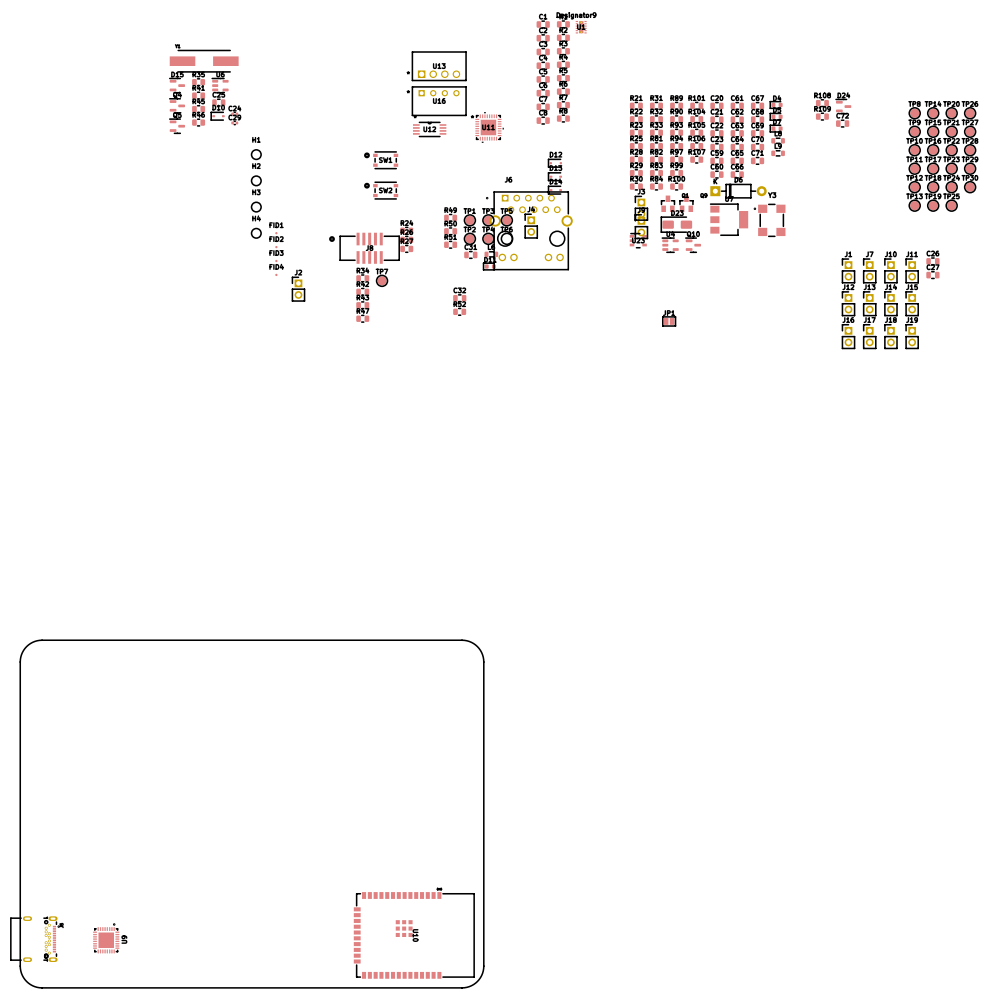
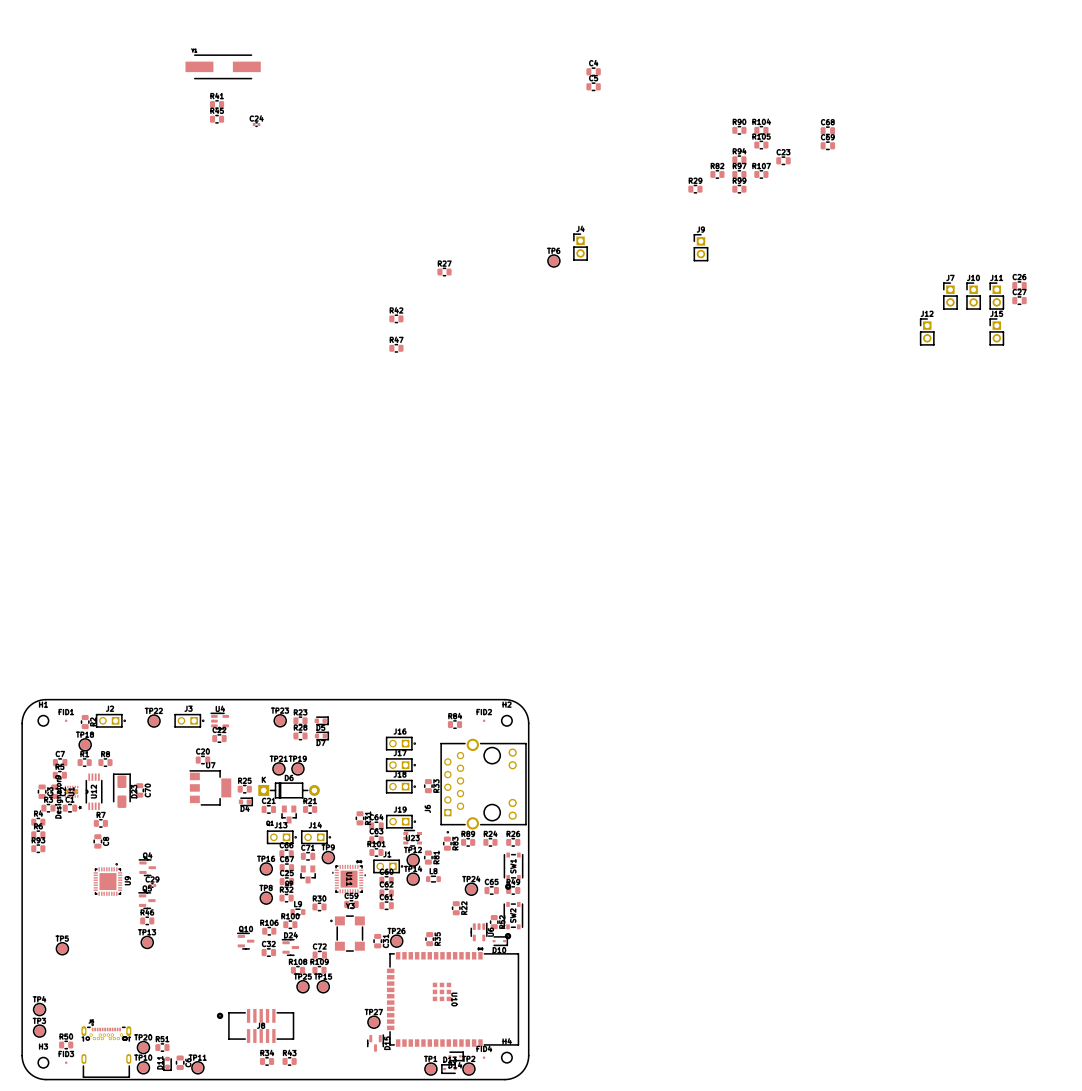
part position: (543, 24) -> (69, 808)
part position: (563, 24) -> (84, 762)
part rotation: 0° (581, 27) -> 90° counterclockwise (71, 791)
part position: (581, 27) -> (71, 791)
part rotation: 0° (563, 37) -> 90° clockwise (85, 722)
part position: (563, 37) -> (85, 722)
part rotation: 0° (543, 38) -> 90° clockwise (54, 791)
part position: (543, 38) -> (54, 791)
part rotation: 0° (543, 51) -> 90° clockwise (42, 791)
part position: (543, 51) -> (42, 791)
part position: (563, 51) -> (48, 808)
part position: (563, 64) -> (38, 822)
part: (439, 66) -> none
part position: (563, 78) -> (59, 775)
part rotation: 0° (198, 82) -> 90° clockwise (429, 939)
part position: (198, 82) -> (429, 939)
part rotation: 0° (177, 85) -> 90° clockwise (375, 1043)
part position: (177, 85) -> (375, 1043)
part rotation: 0° (220, 85) -> 90° clockwise (479, 932)
part position: (220, 85) -> (479, 932)
part position: (563, 91) -> (38, 834)
part rotation: 0° (543, 93) -> 90° clockwise (180, 1062)
part position: (543, 93) -> (180, 1062)
part: (439, 101) -> none
part position: (218, 102) -> (286, 881)
part position: (822, 103) -> (297, 970)
part rotation: 0° (776, 104) -> 180° (245, 801)
part position: (776, 104) -> (245, 801)
part position: (177, 105) -> (147, 867)
part position: (563, 105) -> (100, 823)
part position: (636, 105) -> (310, 809)
part rotation: 0° (656, 105) -> 90° clockwise (360, 818)
part position: (656, 105) -> (360, 818)
part position: (676, 105) -> (468, 842)
part position: (696, 105) -> (376, 852)
part position: (716, 105) -> (202, 760)
part position: (737, 105) -> (386, 905)
part position: (757, 105) -> (286, 867)
part position: (543, 106) -> (60, 762)
part position: (843, 106) -> (290, 947)
part position: (914, 113) -> (266, 898)
part position: (933, 113) -> (413, 879)
part position: (951, 113) -> (143, 1047)
part position: (970, 113) -> (396, 941)
part rotation: 0° (217, 116) -> 180° (500, 941)
part position: (217, 116) -> (500, 941)
part rotation: 0° (776, 116) -> 180° (321, 720)
part position: (776, 116) -> (321, 720)
part position: (822, 116) -> (319, 970)
part position: (563, 118) -> (105, 762)
part rotation: 0° (636, 119) -> 90° clockwise (456, 908)
part position: (636, 119) -> (456, 908)
part position: (656, 119) -> (286, 898)
part position: (716, 119) -> (268, 809)
part position: (737, 119) -> (386, 893)
part rotation: 0° (543, 120) -> 90° clockwise (97, 841)
part position: (543, 120) -> (97, 841)
part position: (198, 122) -> (147, 920)
part position: (234, 122) -> (152, 885)
part position: (842, 123) -> (319, 955)
part position: (177, 126) -> (147, 900)
part rotation: 0° (489, 127) -> 90° clockwise (349, 880)
part position: (489, 127) -> (349, 880)
part rotation: 0° (776, 128) -> 180° (321, 735)
part position: (776, 128) -> (321, 735)
part rotation: 0° (429, 129) -> 90° counterclockwise (94, 791)
part position: (429, 129) -> (94, 791)
part position: (914, 131) -> (328, 857)
part position: (933, 131) -> (323, 986)
part position: (951, 131) -> (278, 768)
part position: (970, 131) -> (373, 1022)
part position: (636, 132) -> (300, 720)
part rotation: 0° (656, 132) -> 90° clockwise (428, 786)
part position: (656, 132) -> (428, 786)
part position: (676, 132) -> (38, 848)
part position: (716, 133) -> (219, 738)
part position: (737, 133) -> (376, 839)
part position: (778, 140) -> (433, 879)
part position: (636, 146) -> (244, 789)
part rotation: 0° (656, 146) -> 90° clockwise (428, 857)
part position: (656, 146) -> (428, 857)
part position: (696, 146) -> (269, 931)
part position: (737, 147) -> (376, 825)
part rotation: 0° (757, 147) -> 90° clockwise (139, 790)
part position: (757, 147) -> (139, 790)
part position: (914, 150) -> (143, 1067)
part position: (933, 150) -> (266, 868)
part position: (951, 150) -> (154, 721)
part: (970, 150) -> none
part position: (778, 153) -> (297, 912)
part position: (256, 154) -> (43, 720)
part position: (636, 159) -> (300, 735)
part rotation: 0° (381, 160) -> 90° counterclockwise (513, 871)
part position: (381, 160) -> (513, 871)
part position: (716, 160) -> (351, 904)
part position: (737, 160) -> (491, 890)
part position: (757, 160) -> (308, 856)
part: (555, 163) -> none
part position: (914, 168) -> (197, 1067)
part: (933, 168) -> none
part position: (951, 168) -> (280, 720)
part: (970, 168) -> none
part rotation: 0° (656, 173) -> 90° clockwise (447, 843)
part position: (656, 173) -> (447, 843)
part position: (716, 174) -> (386, 880)
part position: (737, 174) -> (286, 853)
part position: (555, 176) -> (449, 1069)
part position: (256, 180) -> (506, 720)
part position: (636, 186) -> (319, 906)
part position: (656, 186) -> (454, 724)
part position: (676, 186) -> (290, 924)
part position: (914, 187) -> (413, 860)
part position: (933, 187) -> (85, 744)
part position: (951, 187) -> (471, 889)
part: (970, 187) -> none
part rotation: 0° (381, 190) -> 90° counterclockwise (513, 920)
part position: (381, 190) -> (513, 920)
part rotation: 0° (555, 190) -> 180° (455, 1056)
part position: (555, 190) -> (455, 1056)
part position: (738, 191) -> (289, 790)
part footprint: [635, 196, 648, 221] -> [174, 714, 205, 728]
part rotation: 0° (667, 203) -> 180° (289, 814)
part position: (667, 203) -> (289, 814)
part rotation: 0° (686, 203) -> 180° (308, 874)
part position: (686, 203) -> (308, 874)
part position: (914, 205) -> (147, 942)
part position: (933, 205) -> (297, 768)
part position: (951, 205) -> (303, 986)
part position: (256, 207) -> (43, 1062)
part position: (450, 217) -> (513, 890)
part position: (729, 219) -> (210, 787)
part position: (469, 220) -> (430, 1069)
part position: (488, 220) -> (39, 1031)
part position: (506, 220) -> (62, 948)
part position: (769, 220) -> (347, 933)
part rotation: 0° (676, 224) -> 90° clockwise (121, 790)
part position: (676, 224) -> (121, 790)
part position: (406, 230) -> (490, 842)
part rotation: 0° (529, 230) -> 90° counterclockwise (483, 785)
part position: (529, 230) -> (483, 785)
part position: (450, 231) -> (66, 1045)
part position: (256, 233) -> (506, 1057)
part position: (276, 233) -> (66, 720)
part position: (469, 238) -> (468, 1069)
part position: (488, 238) -> (39, 1009)
part position: (406, 239) -> (513, 842)
part position: (638, 240) -> (412, 838)
part position: (450, 244) -> (162, 1047)
part position: (670, 245) -> (219, 721)
part position: (693, 245) -> (245, 941)
part position: (276, 247) -> (484, 720)
part position: (364, 248) -> (255, 1025)
part rotation: 0° (470, 254) -> 90° clockwise (377, 941)
part position: (470, 254) -> (377, 941)
part: (491, 254) -> none
part footprint: [842, 258, 855, 284] -> [373, 859, 404, 874]
part position: (276, 261) -> (66, 1062)
part rotation: 0° (489, 266) -> 90° counterclockwise (167, 1063)
part position: (489, 266) -> (167, 1063)
part position: (276, 274) -> (484, 1057)
part footprint: [292, 277, 305, 302] -> [96, 714, 126, 728]
part position: (362, 278) -> (267, 1061)
part: (382, 280) -> none
part footprint: [863, 291, 877, 316] -> [267, 830, 297, 844]
part footprint: [884, 291, 898, 316] -> [301, 830, 331, 844]
part position: (459, 298) -> (268, 952)
part position: (362, 305) -> (289, 1061)
part rotation: 0° (459, 311) -> 90° clockwise (494, 922)
part position: (459, 311) -> (494, 922)
part: (669, 321) -> none
part footprint: [842, 324, 855, 349] -> [386, 736, 416, 751]
part footprint: [863, 324, 877, 349] -> [386, 758, 416, 772]
part footprint: [884, 324, 898, 349] -> [386, 779, 416, 794]
part footprint: [905, 324, 919, 349] -> [386, 814, 416, 829]
part position: (414, 935) -> (452, 999)
part position: (106, 938) -> (107, 879)
part rotation: 0° (35, 939) -> 90° counterclockwise (106, 1050)
part position: (35, 939) -> (106, 1050)

